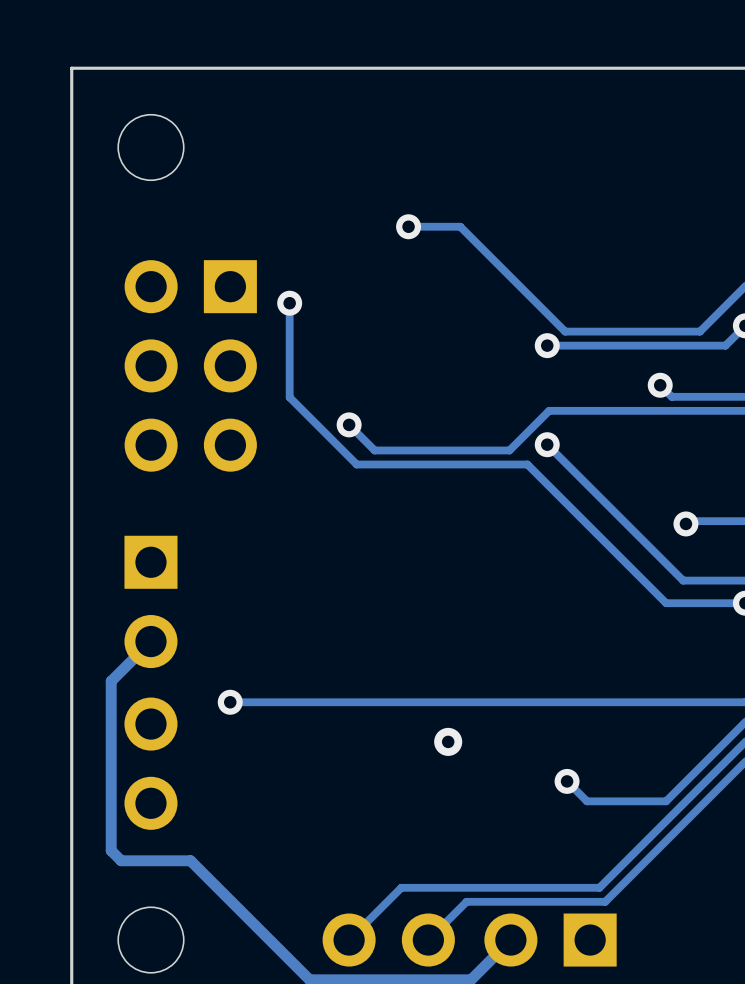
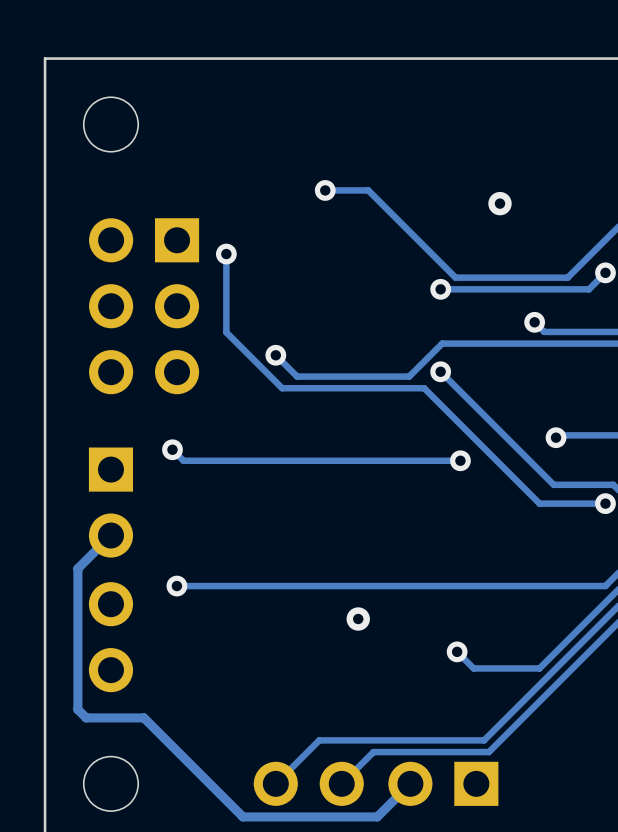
via: none -> (499, 203)
track: none -> (172, 449) (183, 460) (460, 460)
via: none -> (172, 449)
via: none -> (460, 460)

